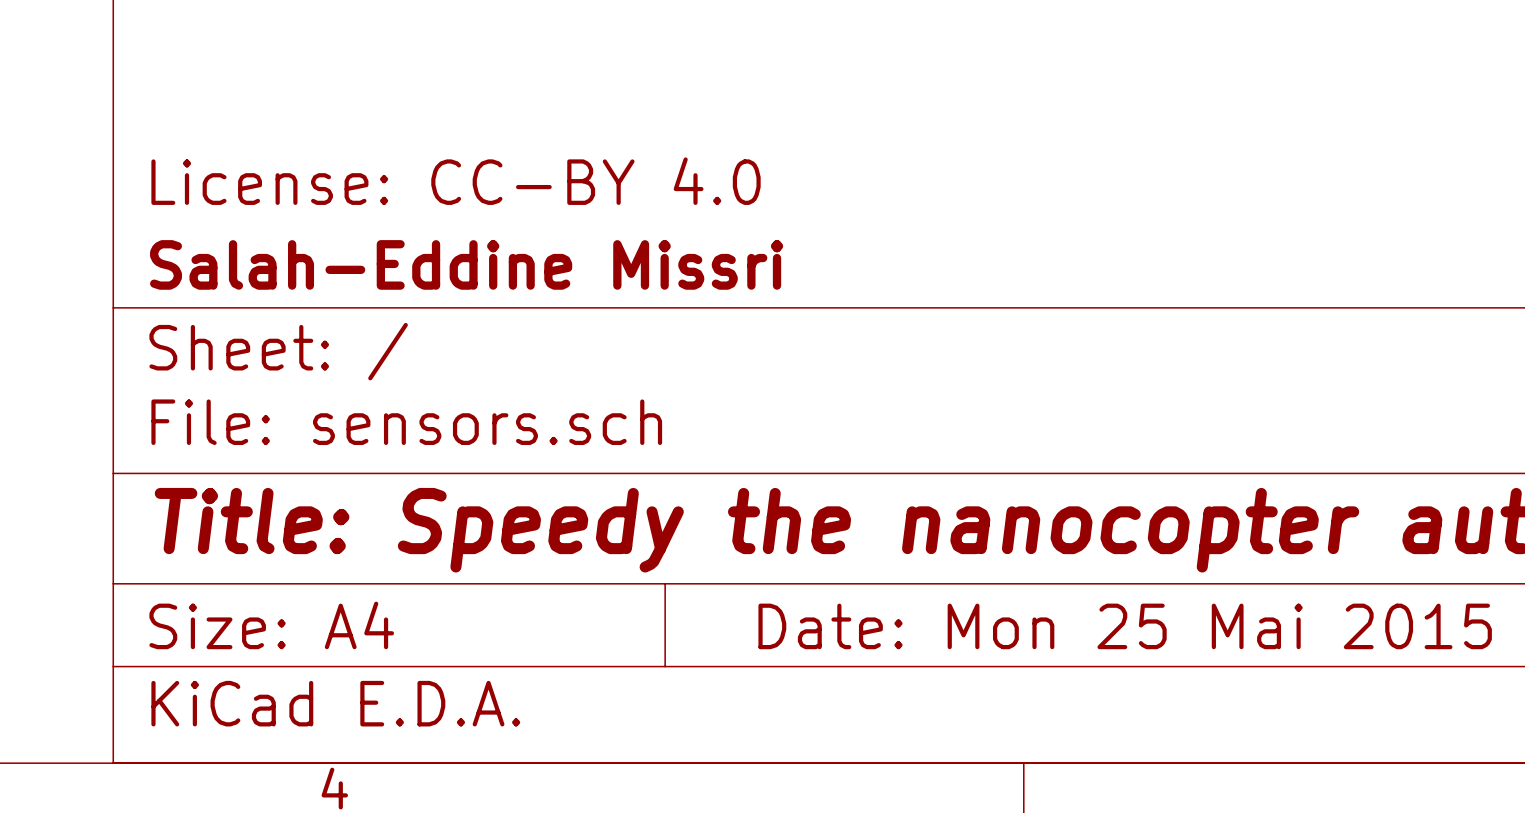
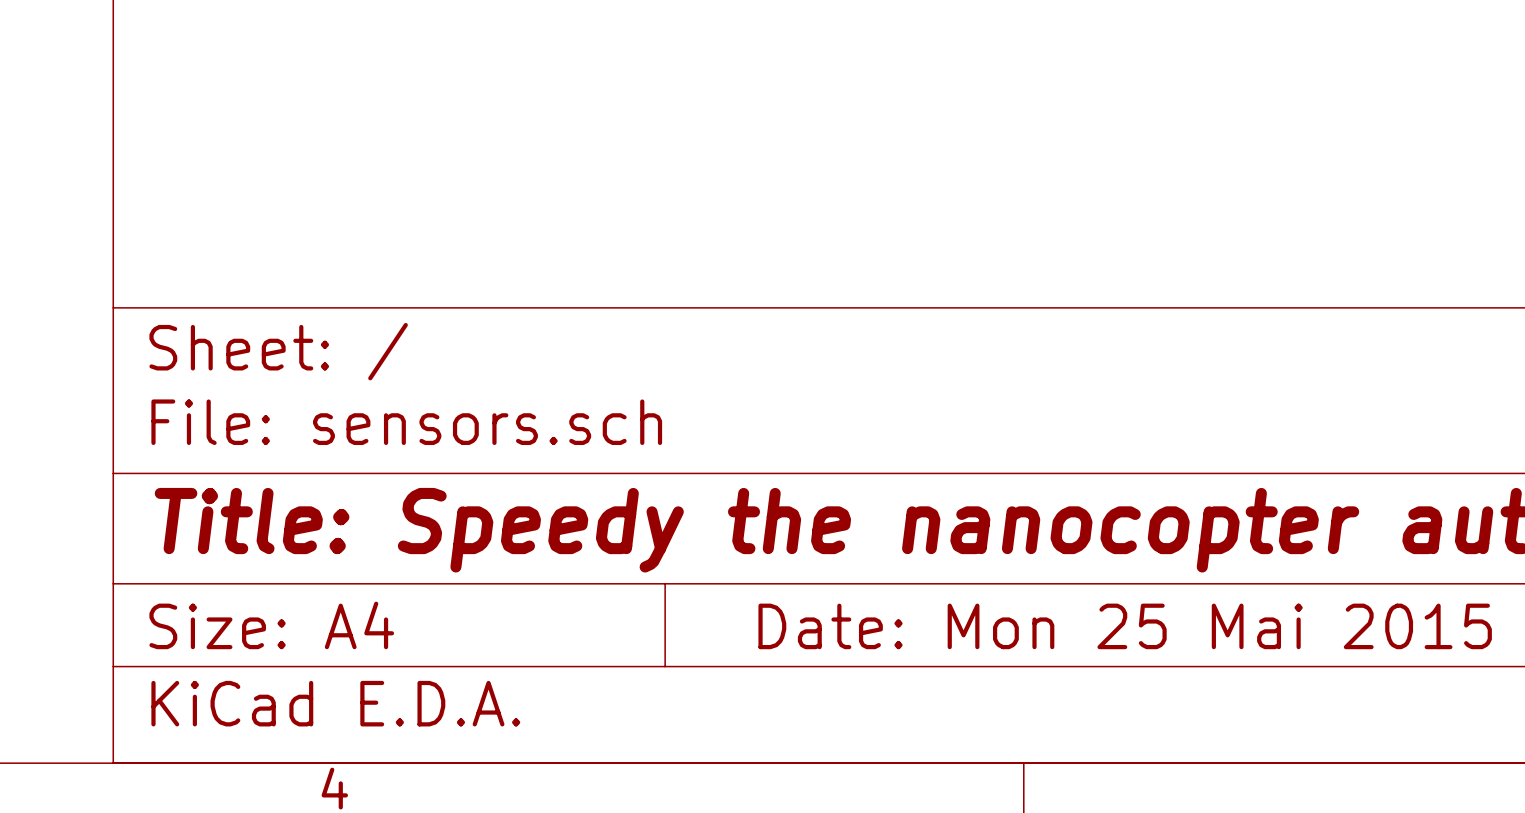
title block: License: CC-BY 4.0 (456, 181) -> none
title block: Salah-Eddine Missri (466, 264) -> none

